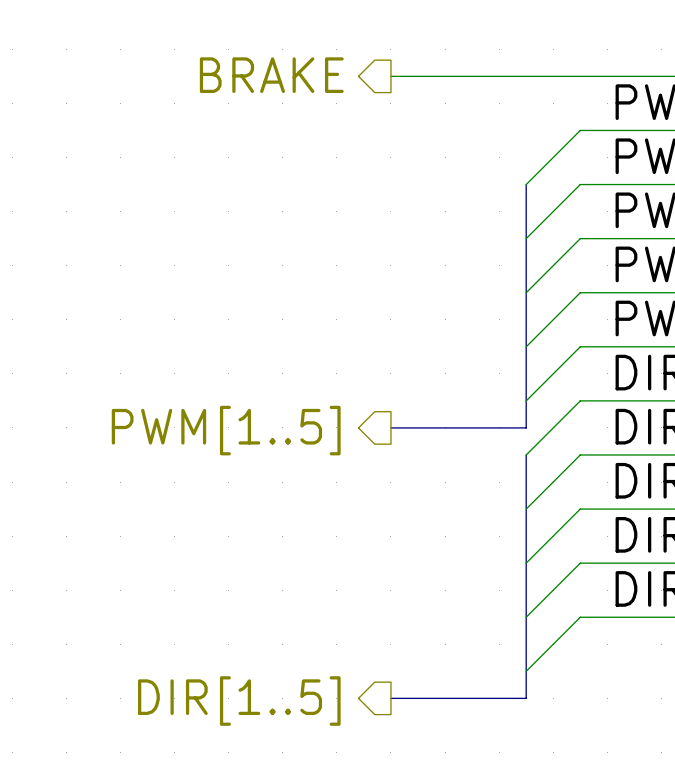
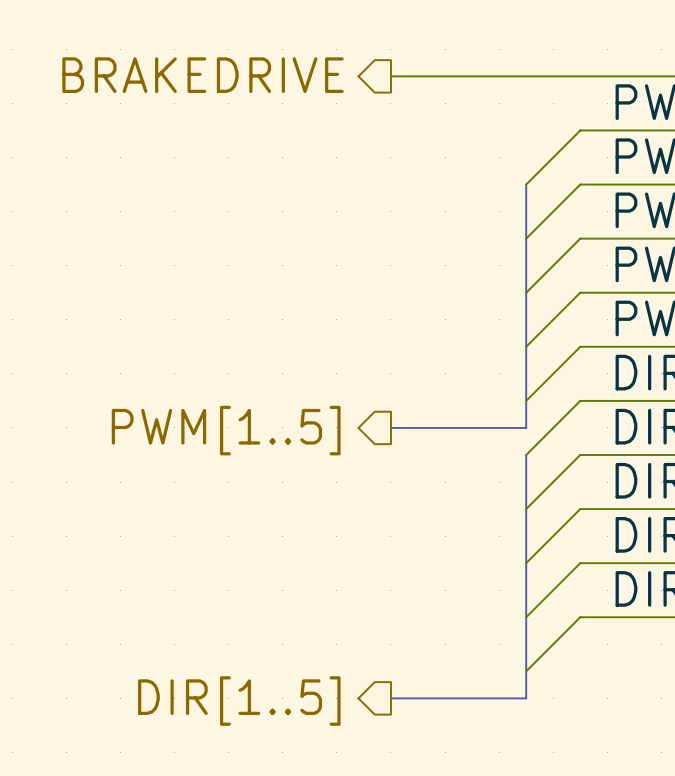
hierarchical label: BRAKE (271, 75) -> BRAKEDRIVE (203, 75)

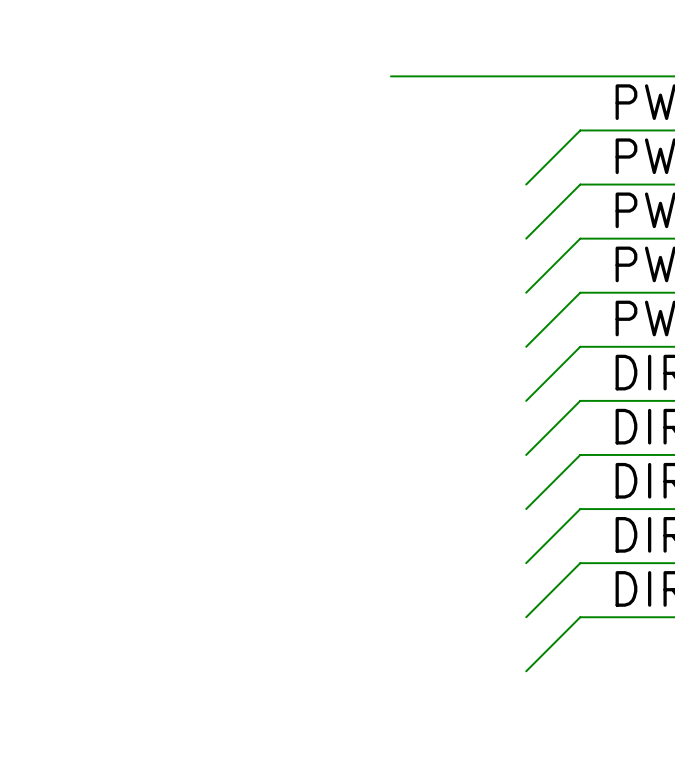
hierarchical label: BRAKEDRIVE (203, 75) -> none
bus: (526, 184) (526, 427) (390, 427) -> none
hierarchical label: PWM[1..5] (226, 430) -> none
bus: (526, 454) (526, 698) (390, 698) -> none
hierarchical label: DIR[1..5] (239, 701) -> none

